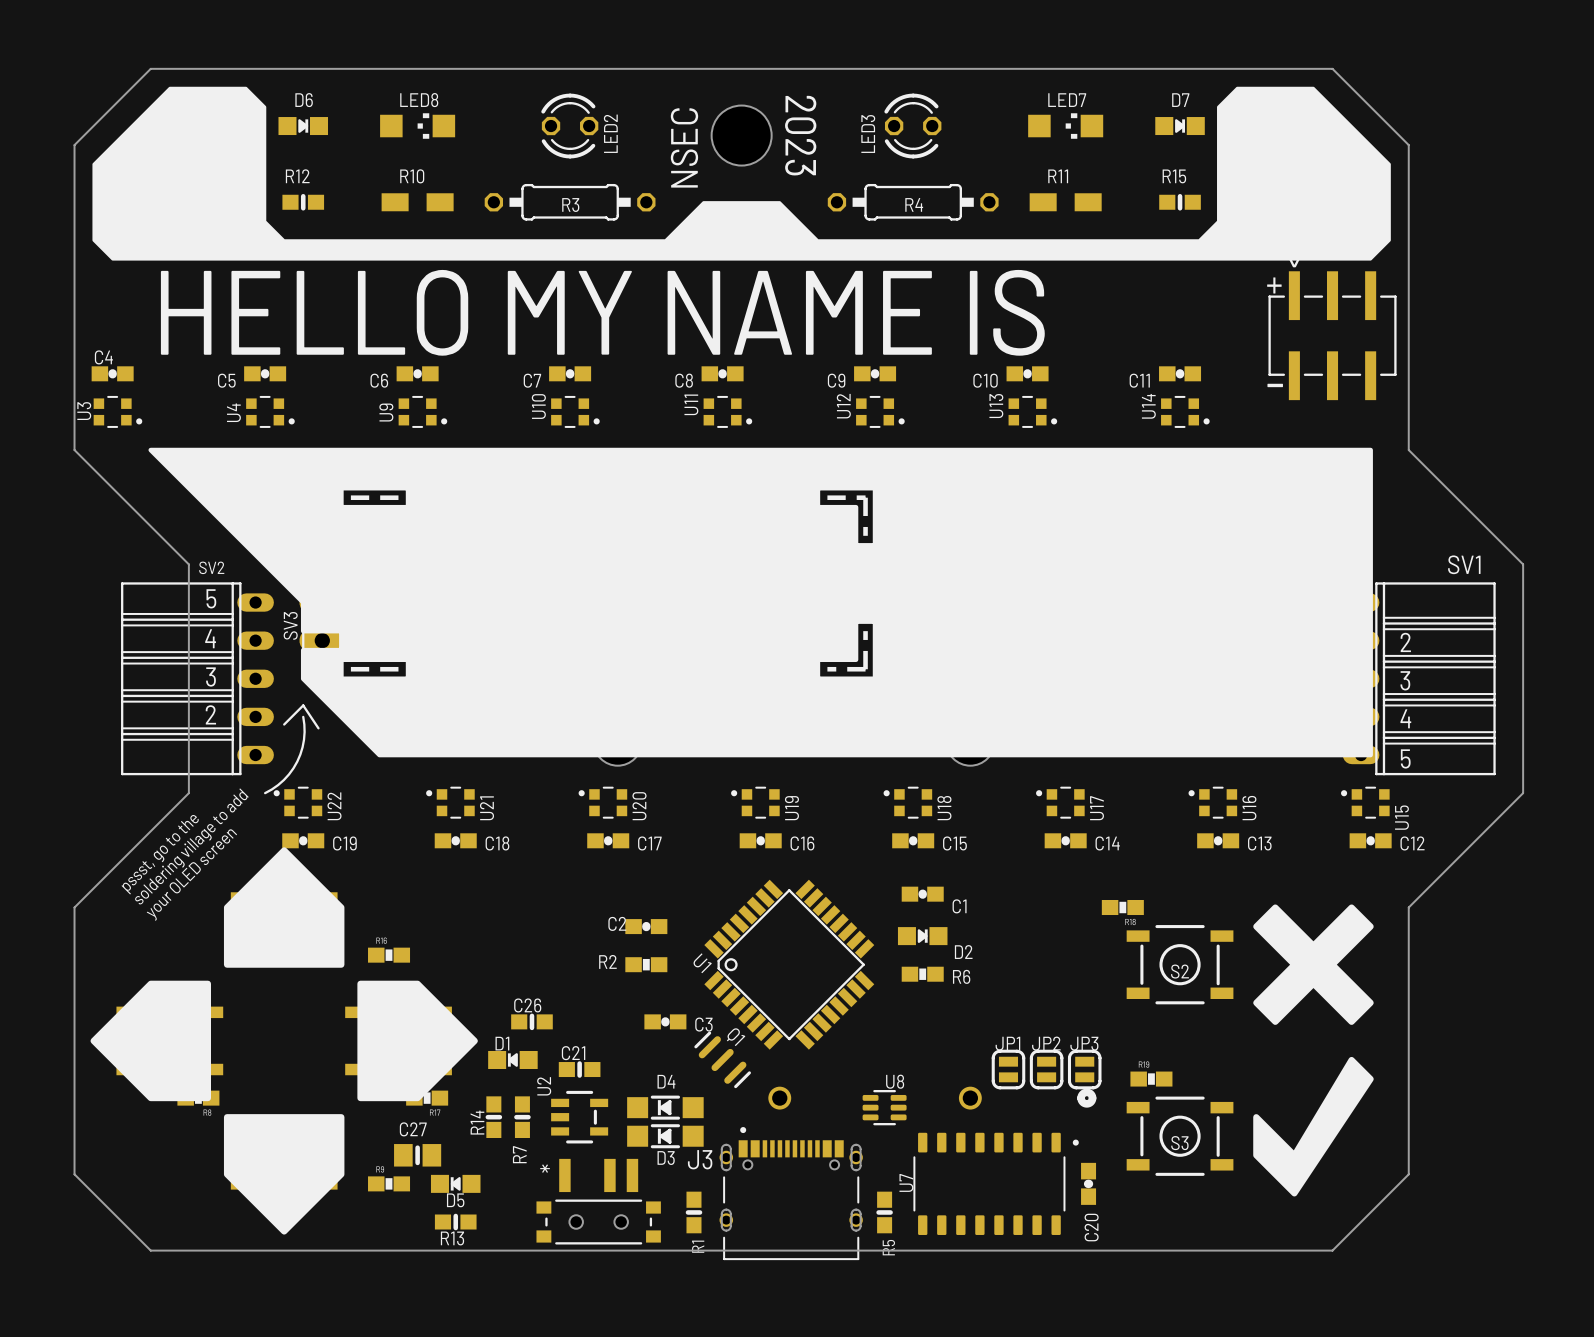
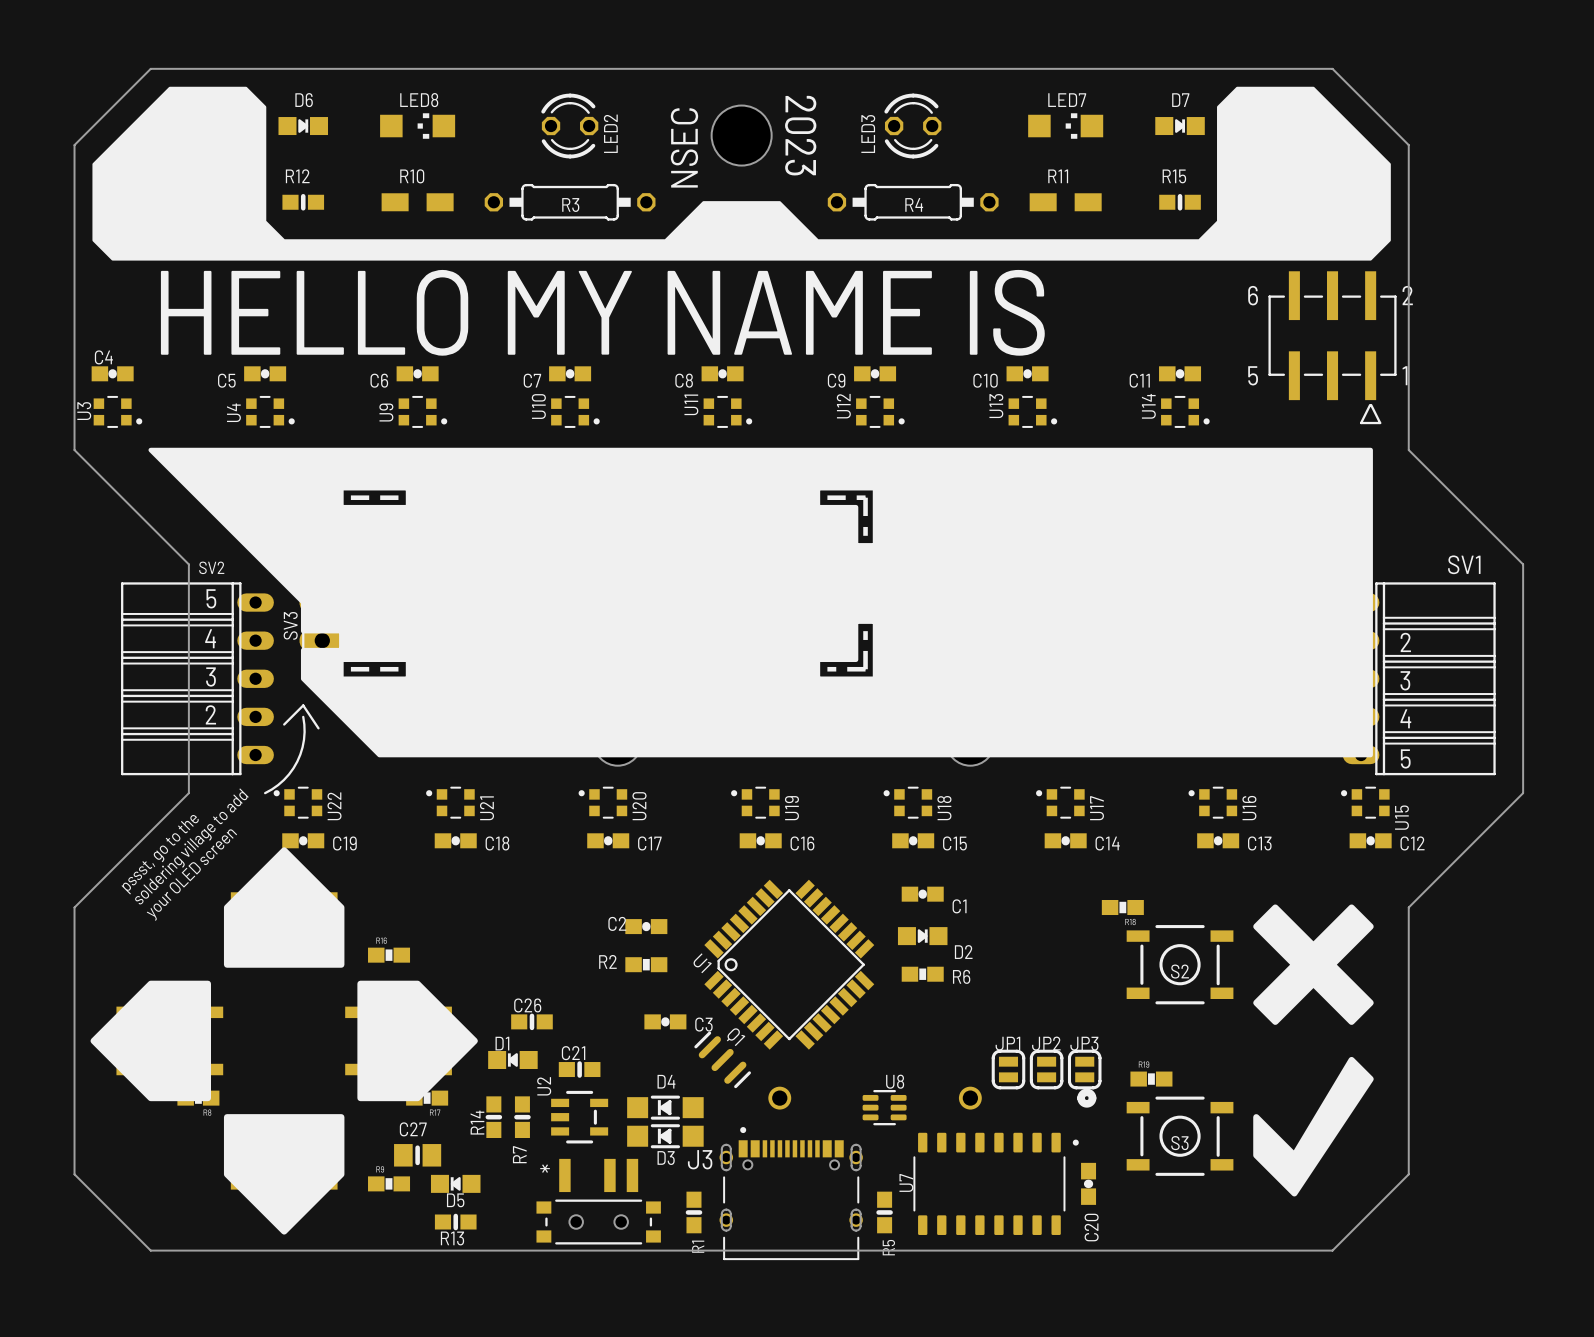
text: + (1274, 285) -> none
part: (1332, 323) -> none
part: none -> (1332, 347)
text: - (1275, 385) -> none

